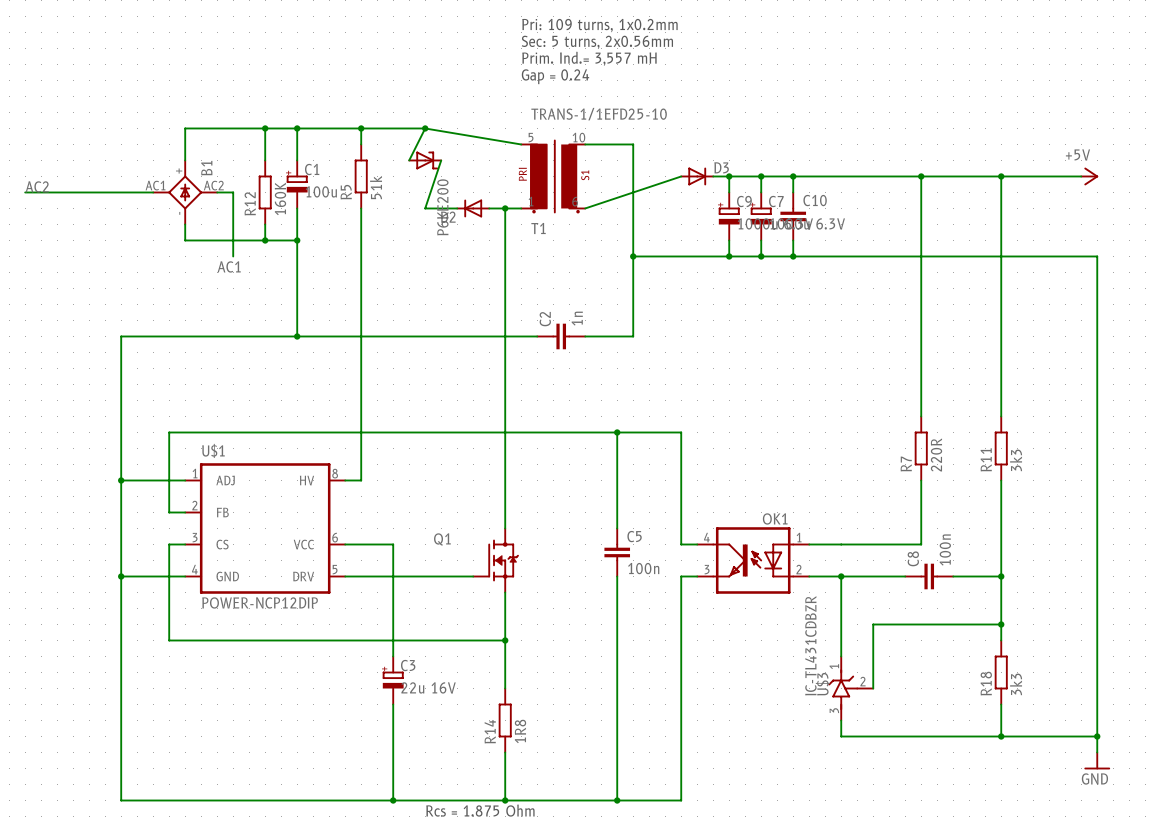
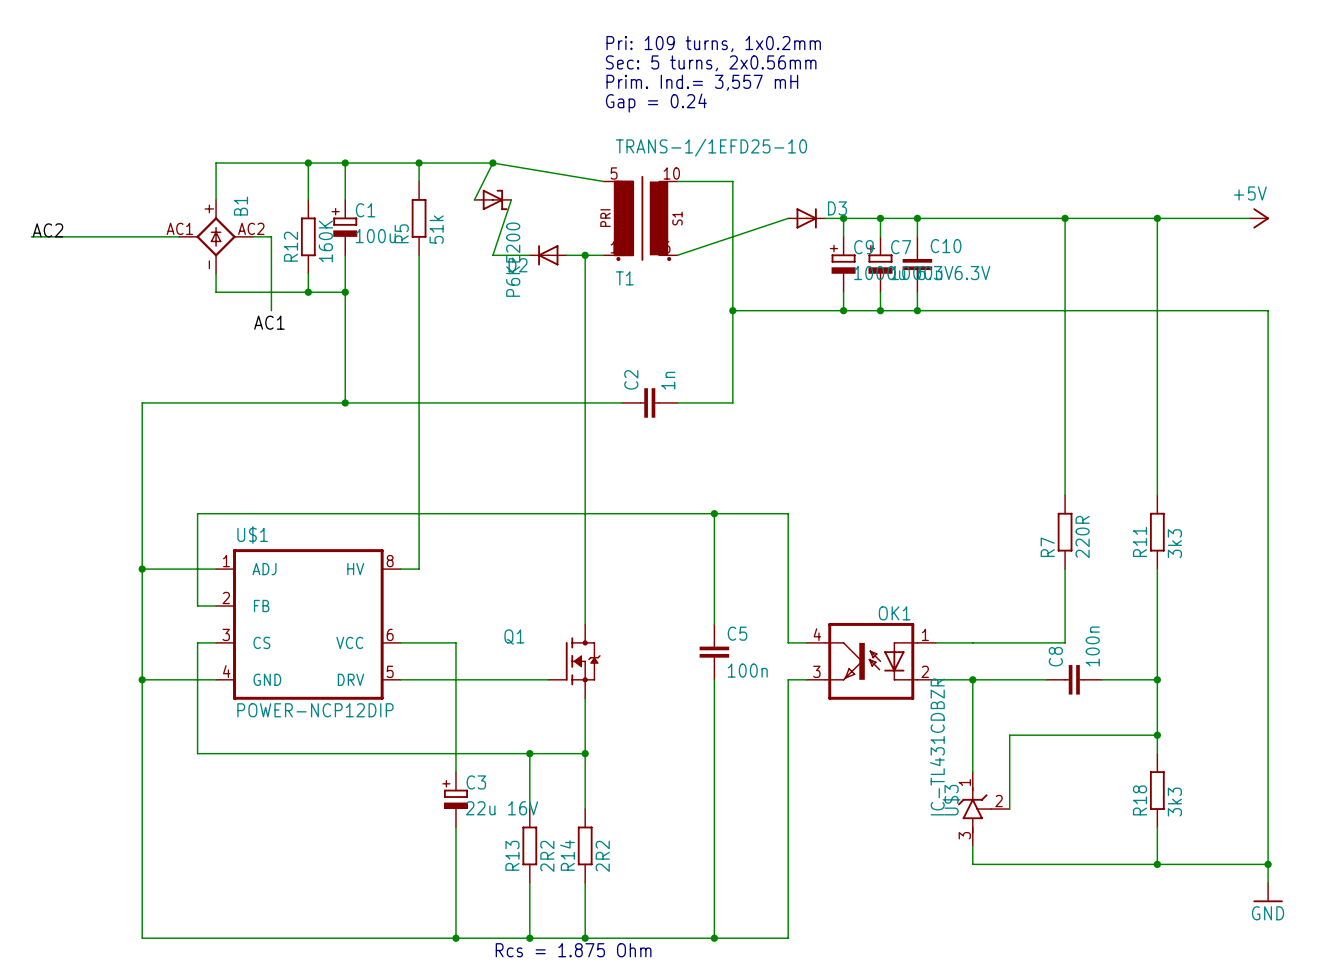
wire: none -> (529, 753) (529, 809)
junction: none -> (529, 753)
R13: none -> 2R2 (529, 845)
R14 value: 1R8 (520, 731) -> 2R2 (602, 856)
wire: none -> (529, 882) (529, 938)
junction: none -> (529, 938)

